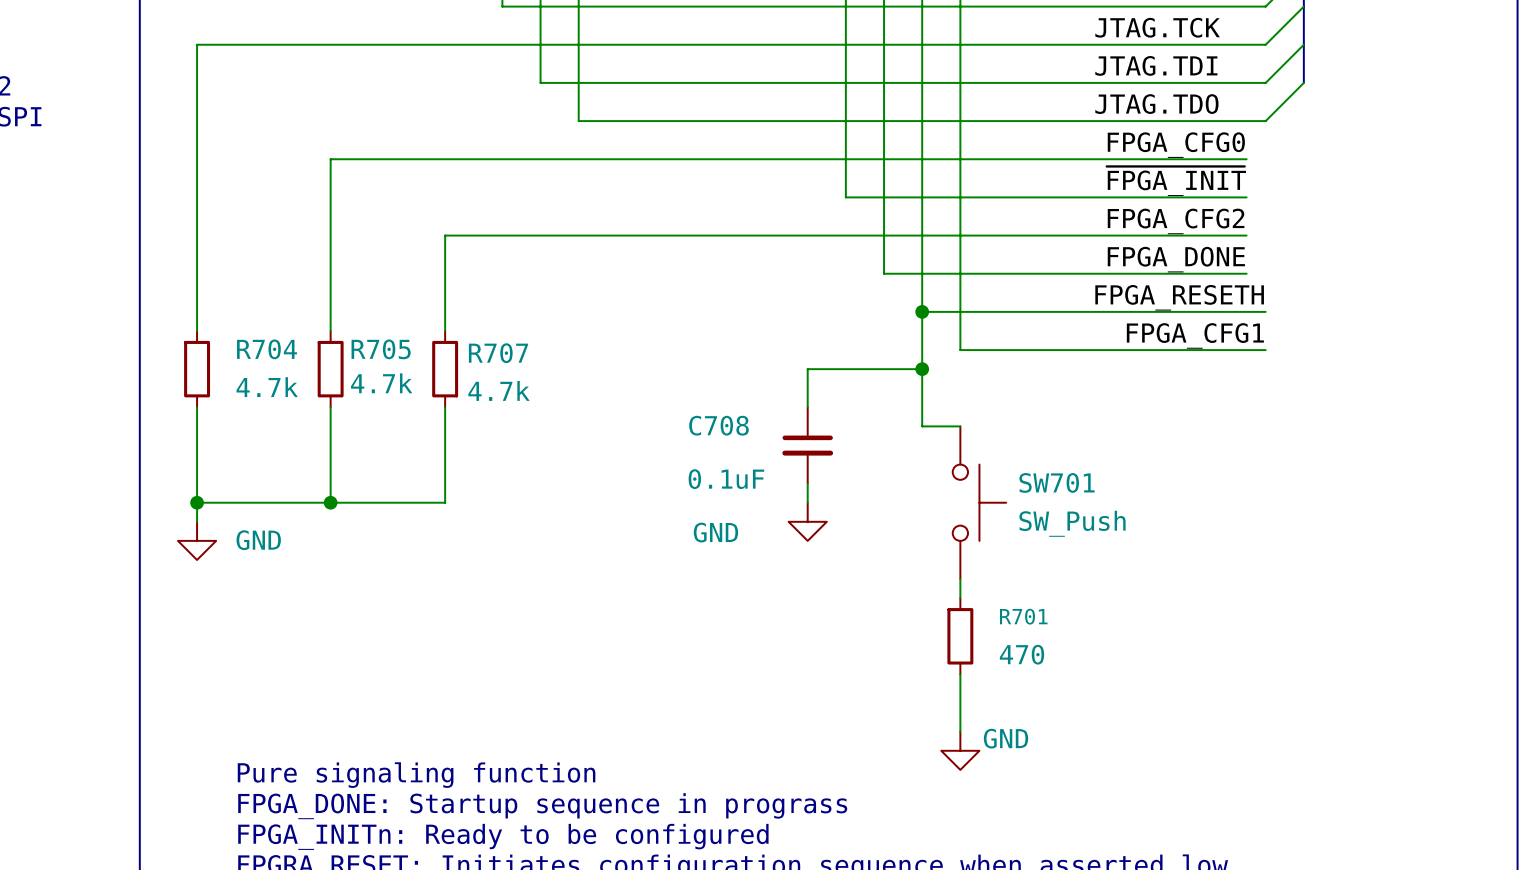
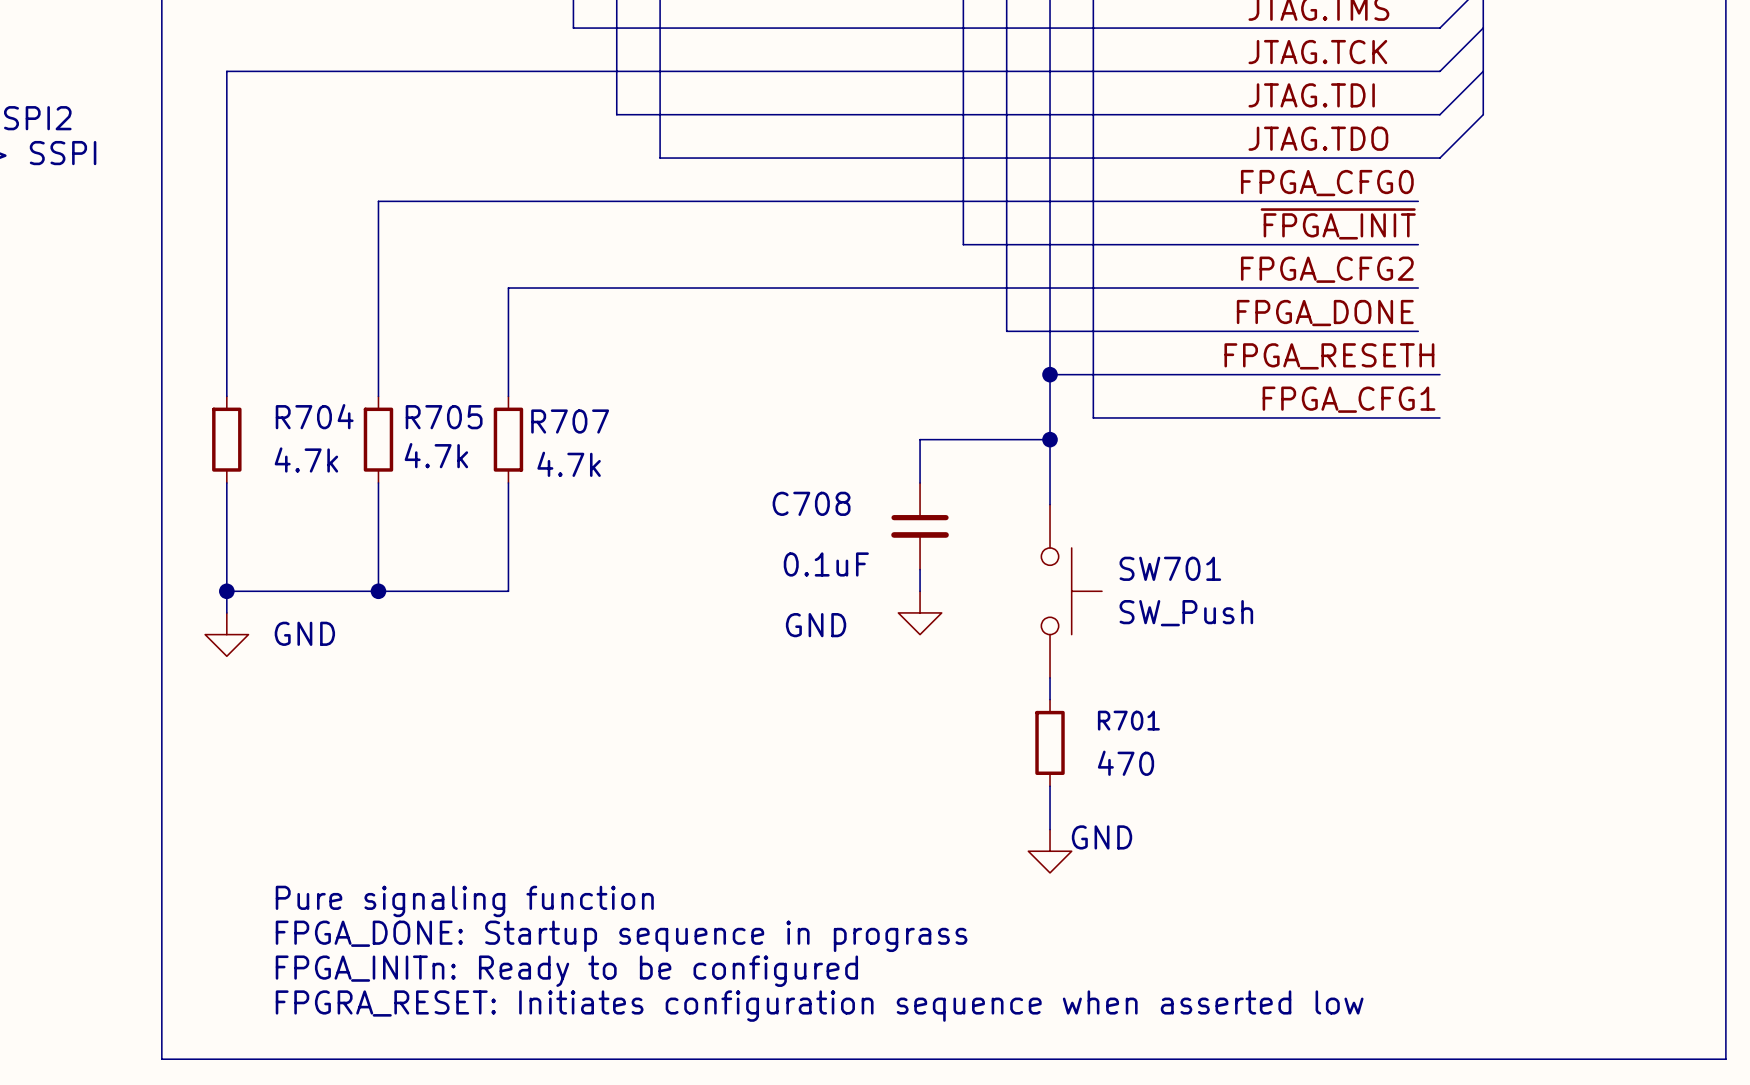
wire: (922, 426) (960, 426) -> none
SW701 position: (979, 502) -> (1071, 591)
wire: (960, 579) (960, 598) -> (1050, 677) (1050, 699)
R701 position: (960, 636) -> (1050, 742)
wire: none -> (1050, 786) (1050, 829)
wire: (960, 674) (960, 731) -> none
power symbol position: GND (960, 750) -> GND (1050, 851)

